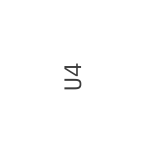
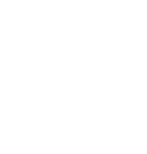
U4: (72, 76) -> none

